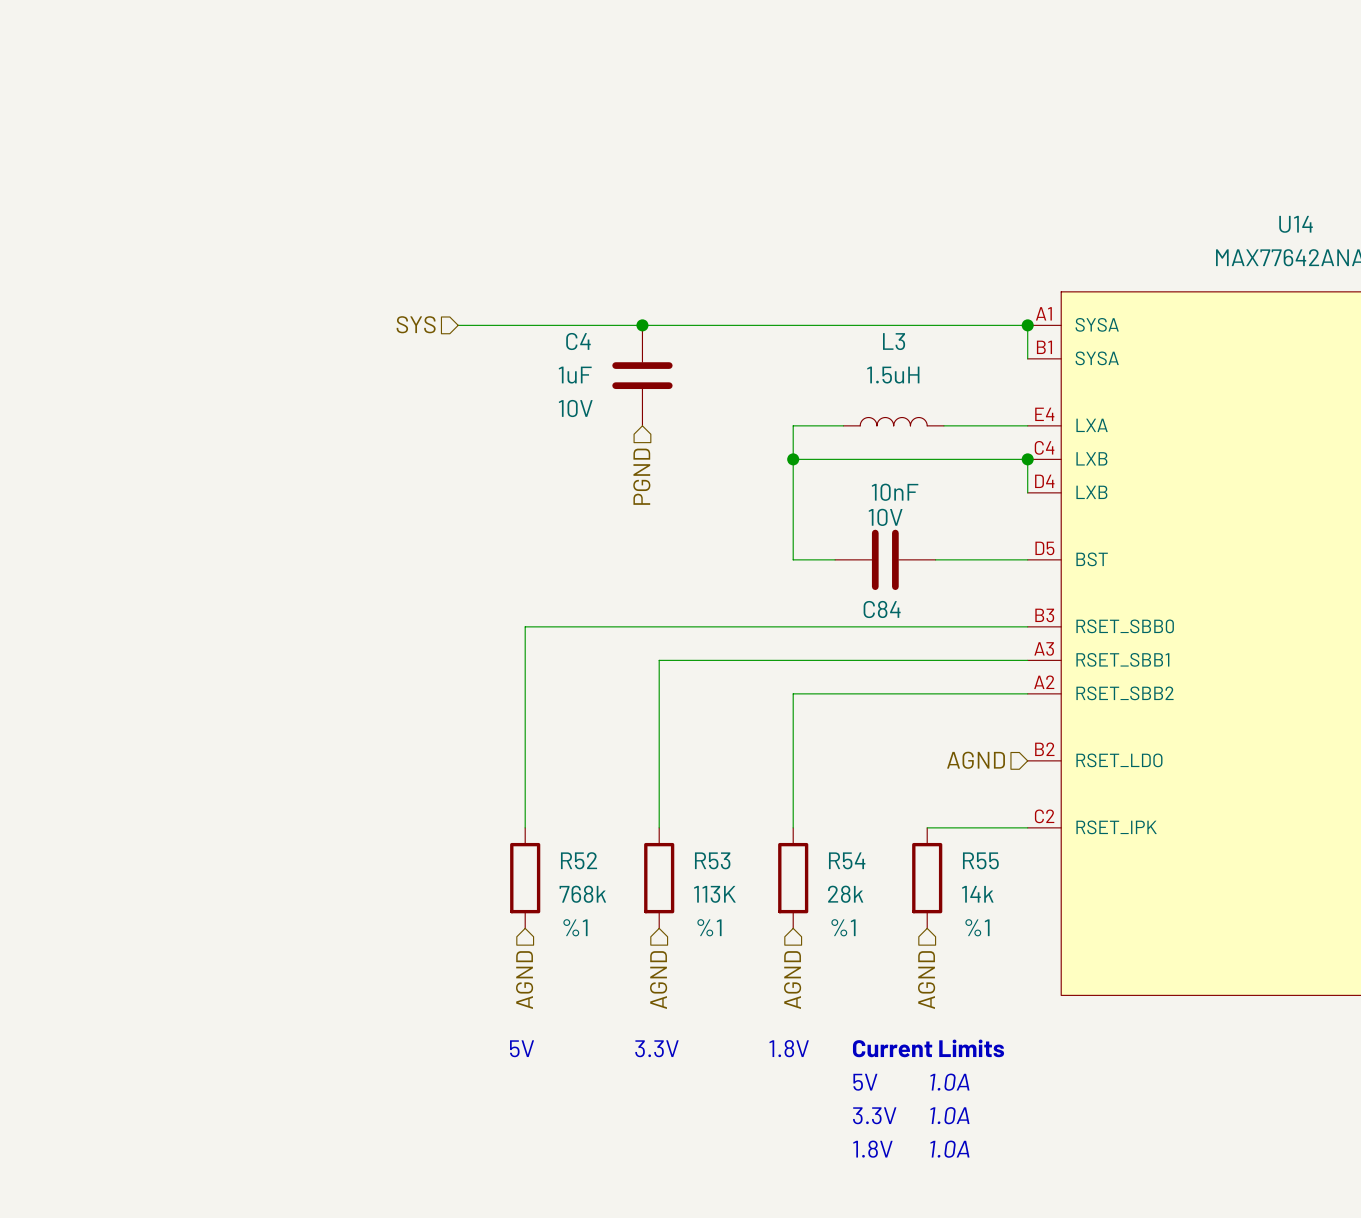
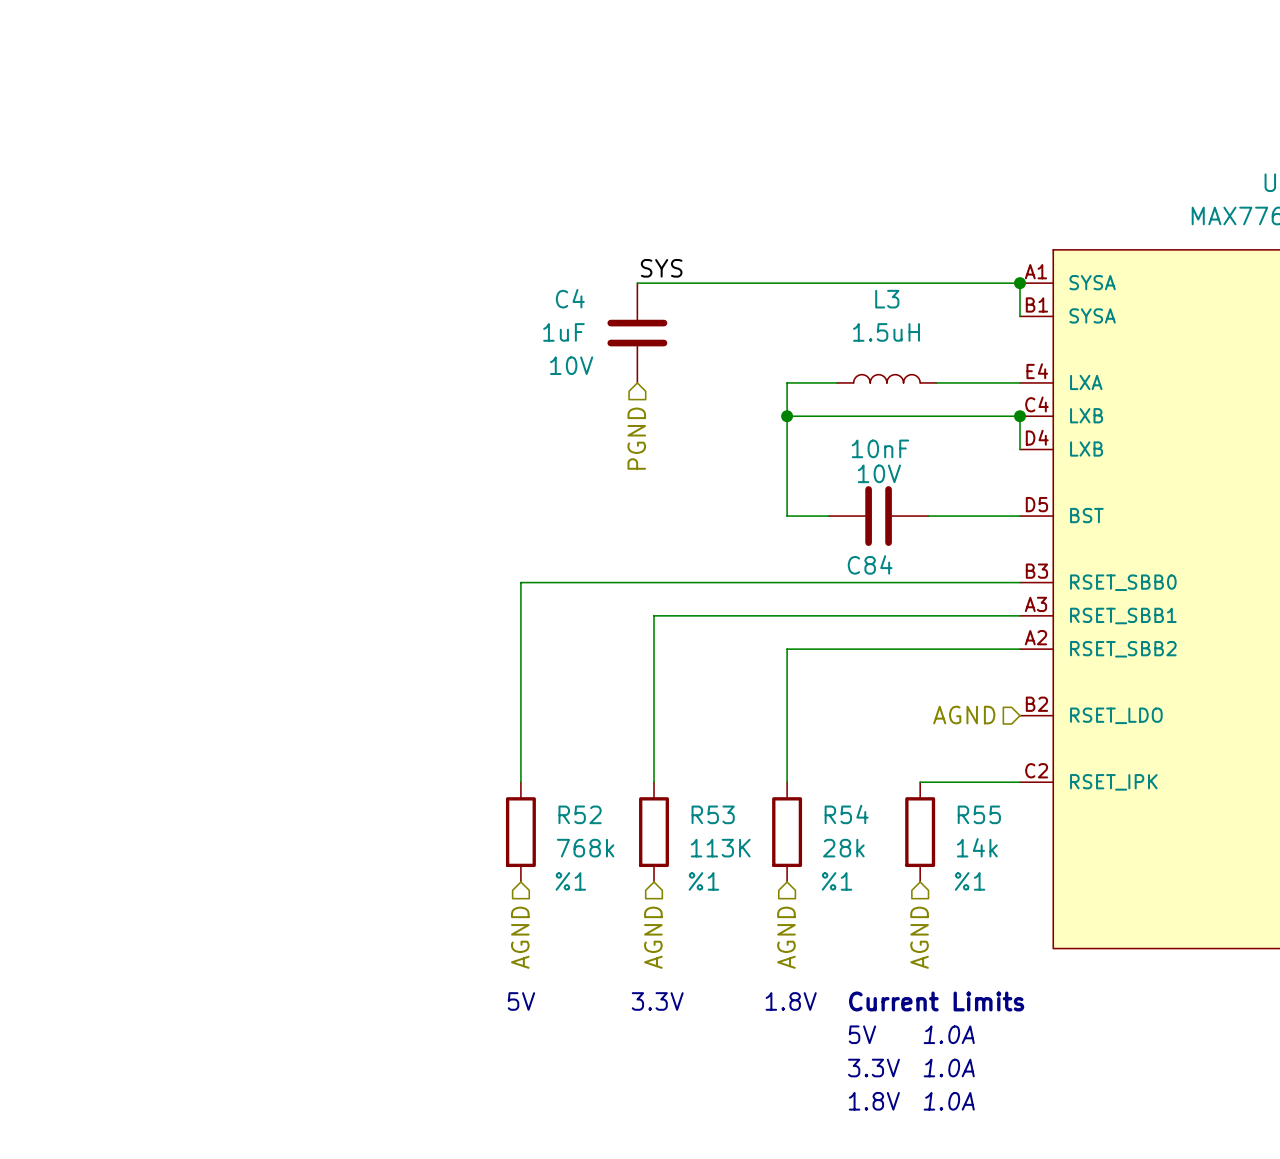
label: none -> SYS (661, 268)
hierarchical label: SYS (416, 324) -> none
wire: (458, 325) (642, 325) -> none
junction: (642, 325) -> none

